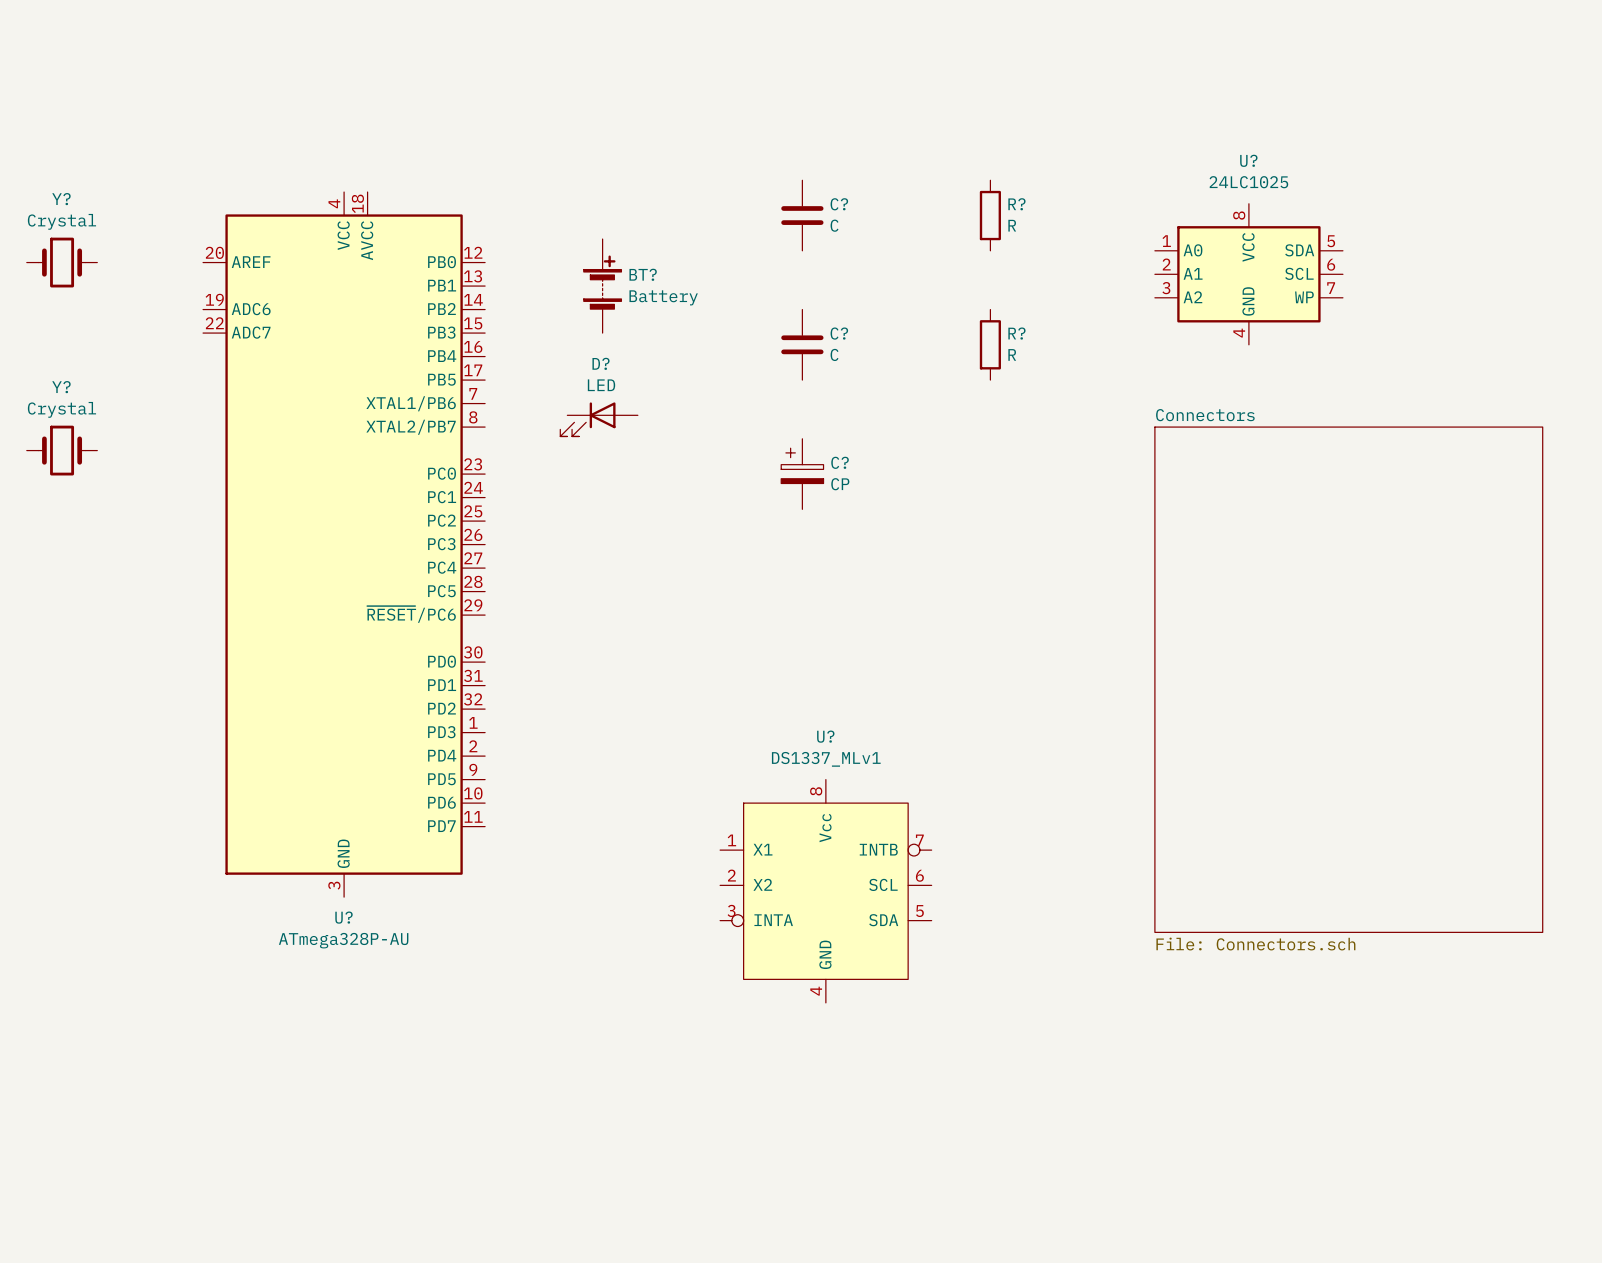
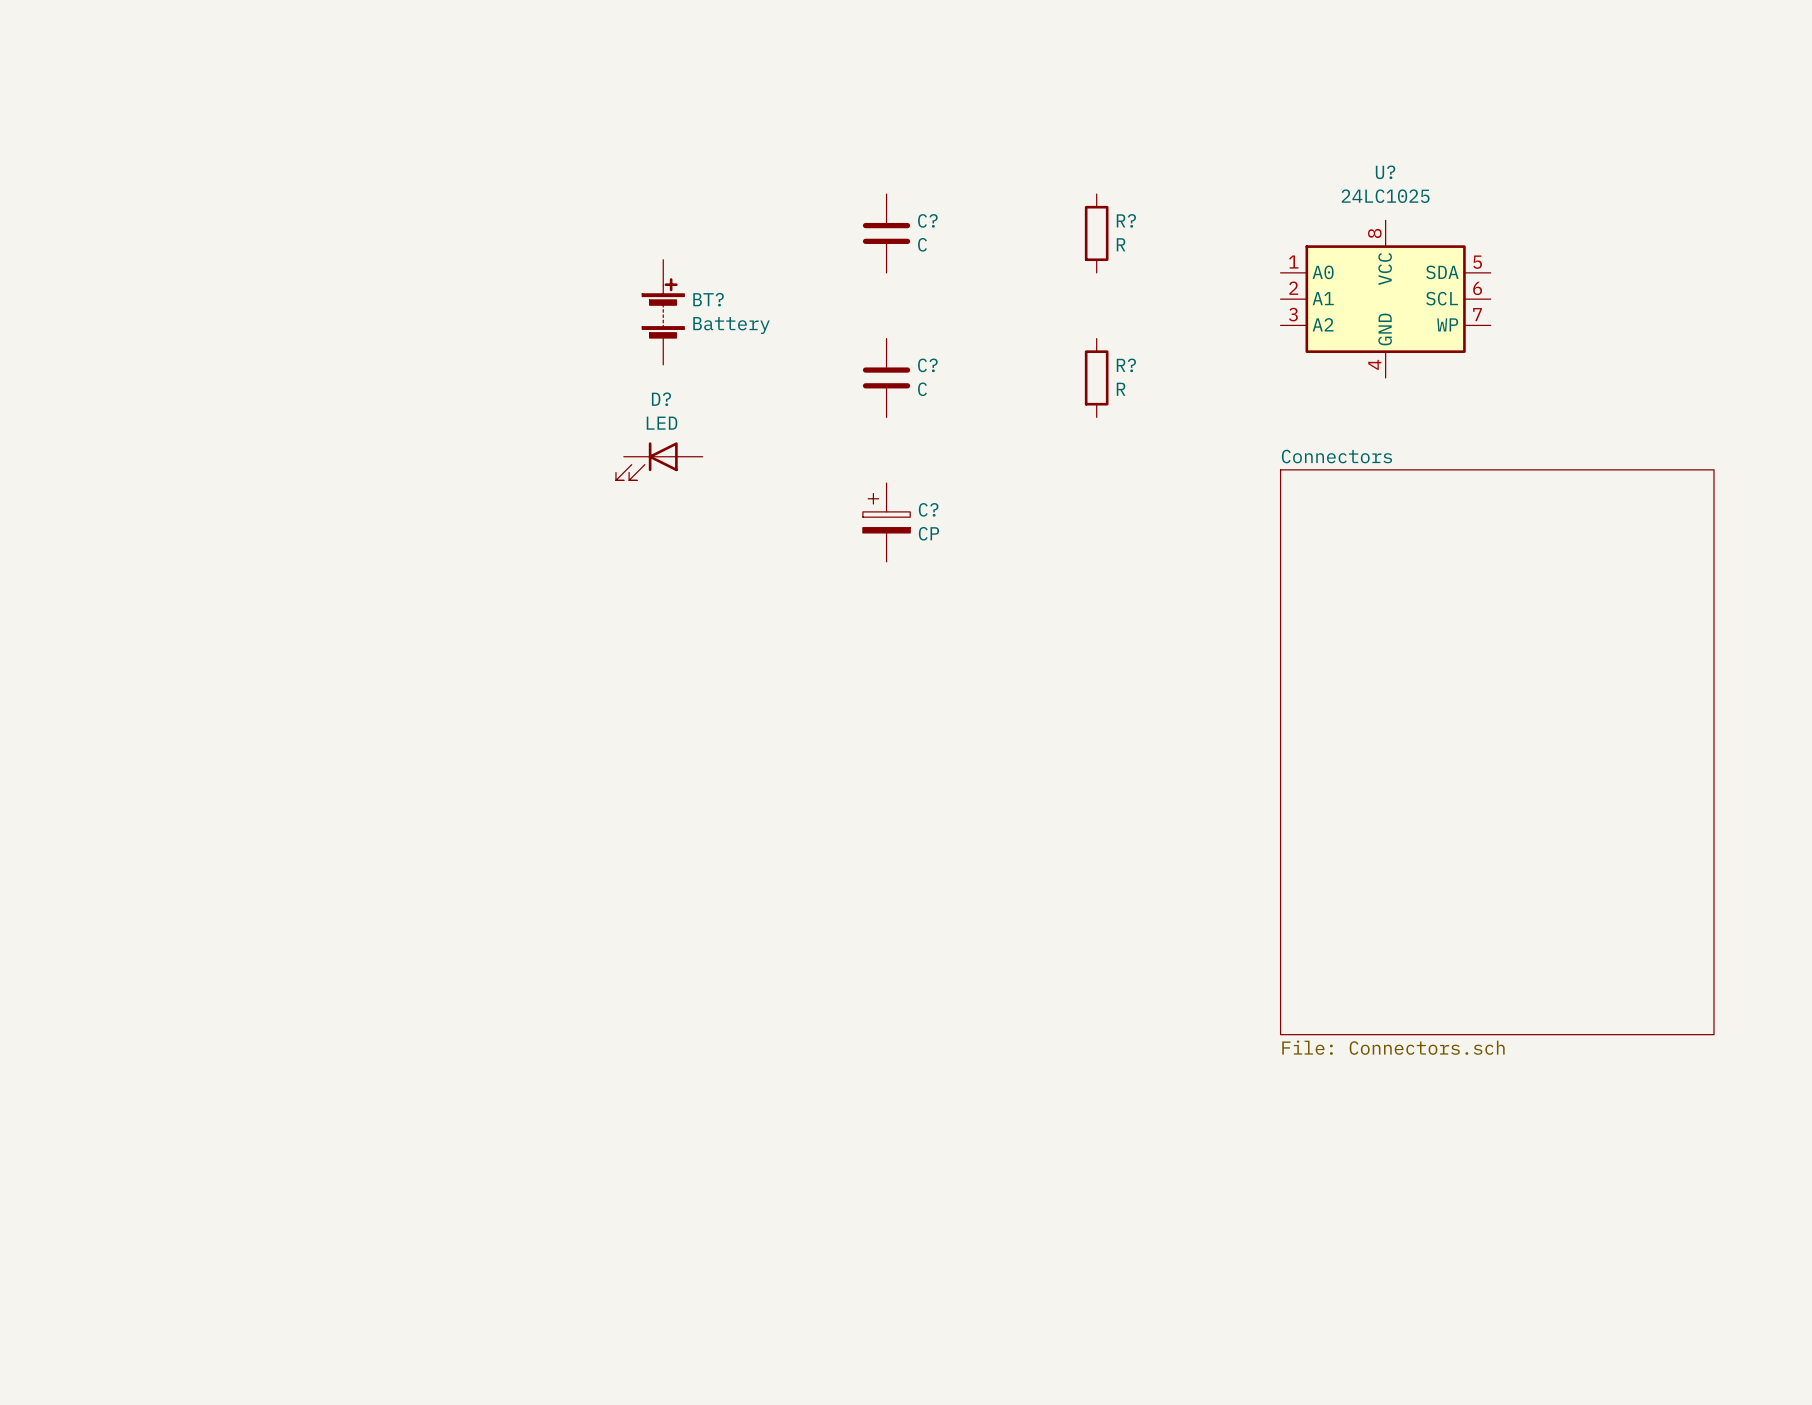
Y?: Crystal (62, 262) -> none
Y?: Crystal (62, 450) -> none
U?: ATmega328P-AU (344, 544) -> none
U?: DS1337_MLv1 (825, 891) -> none

